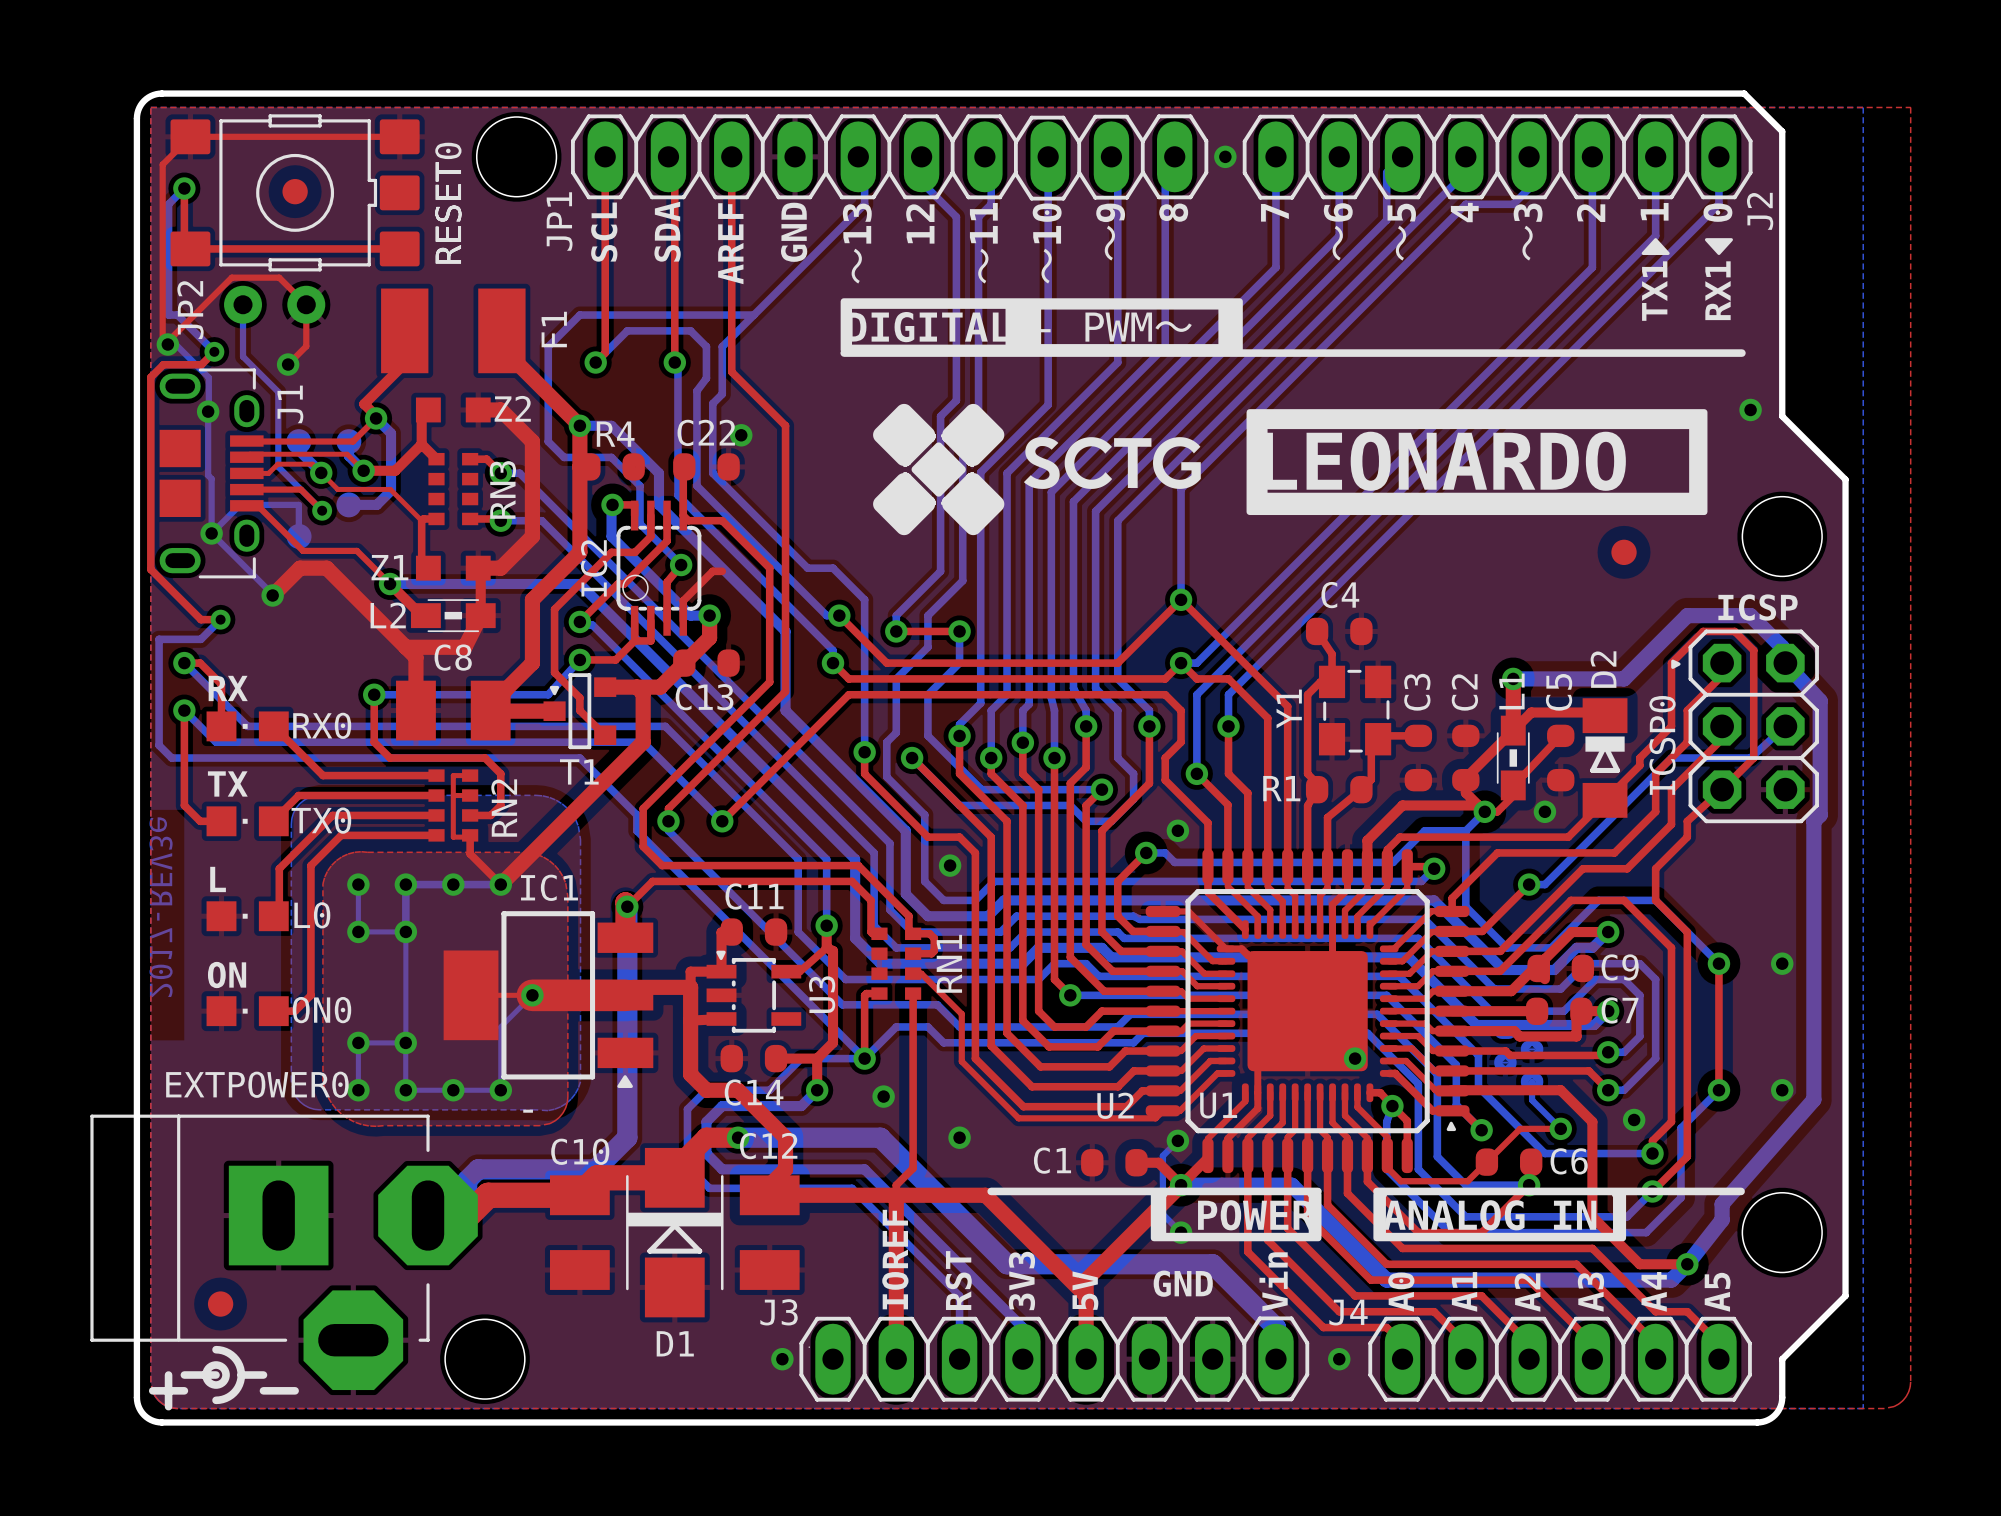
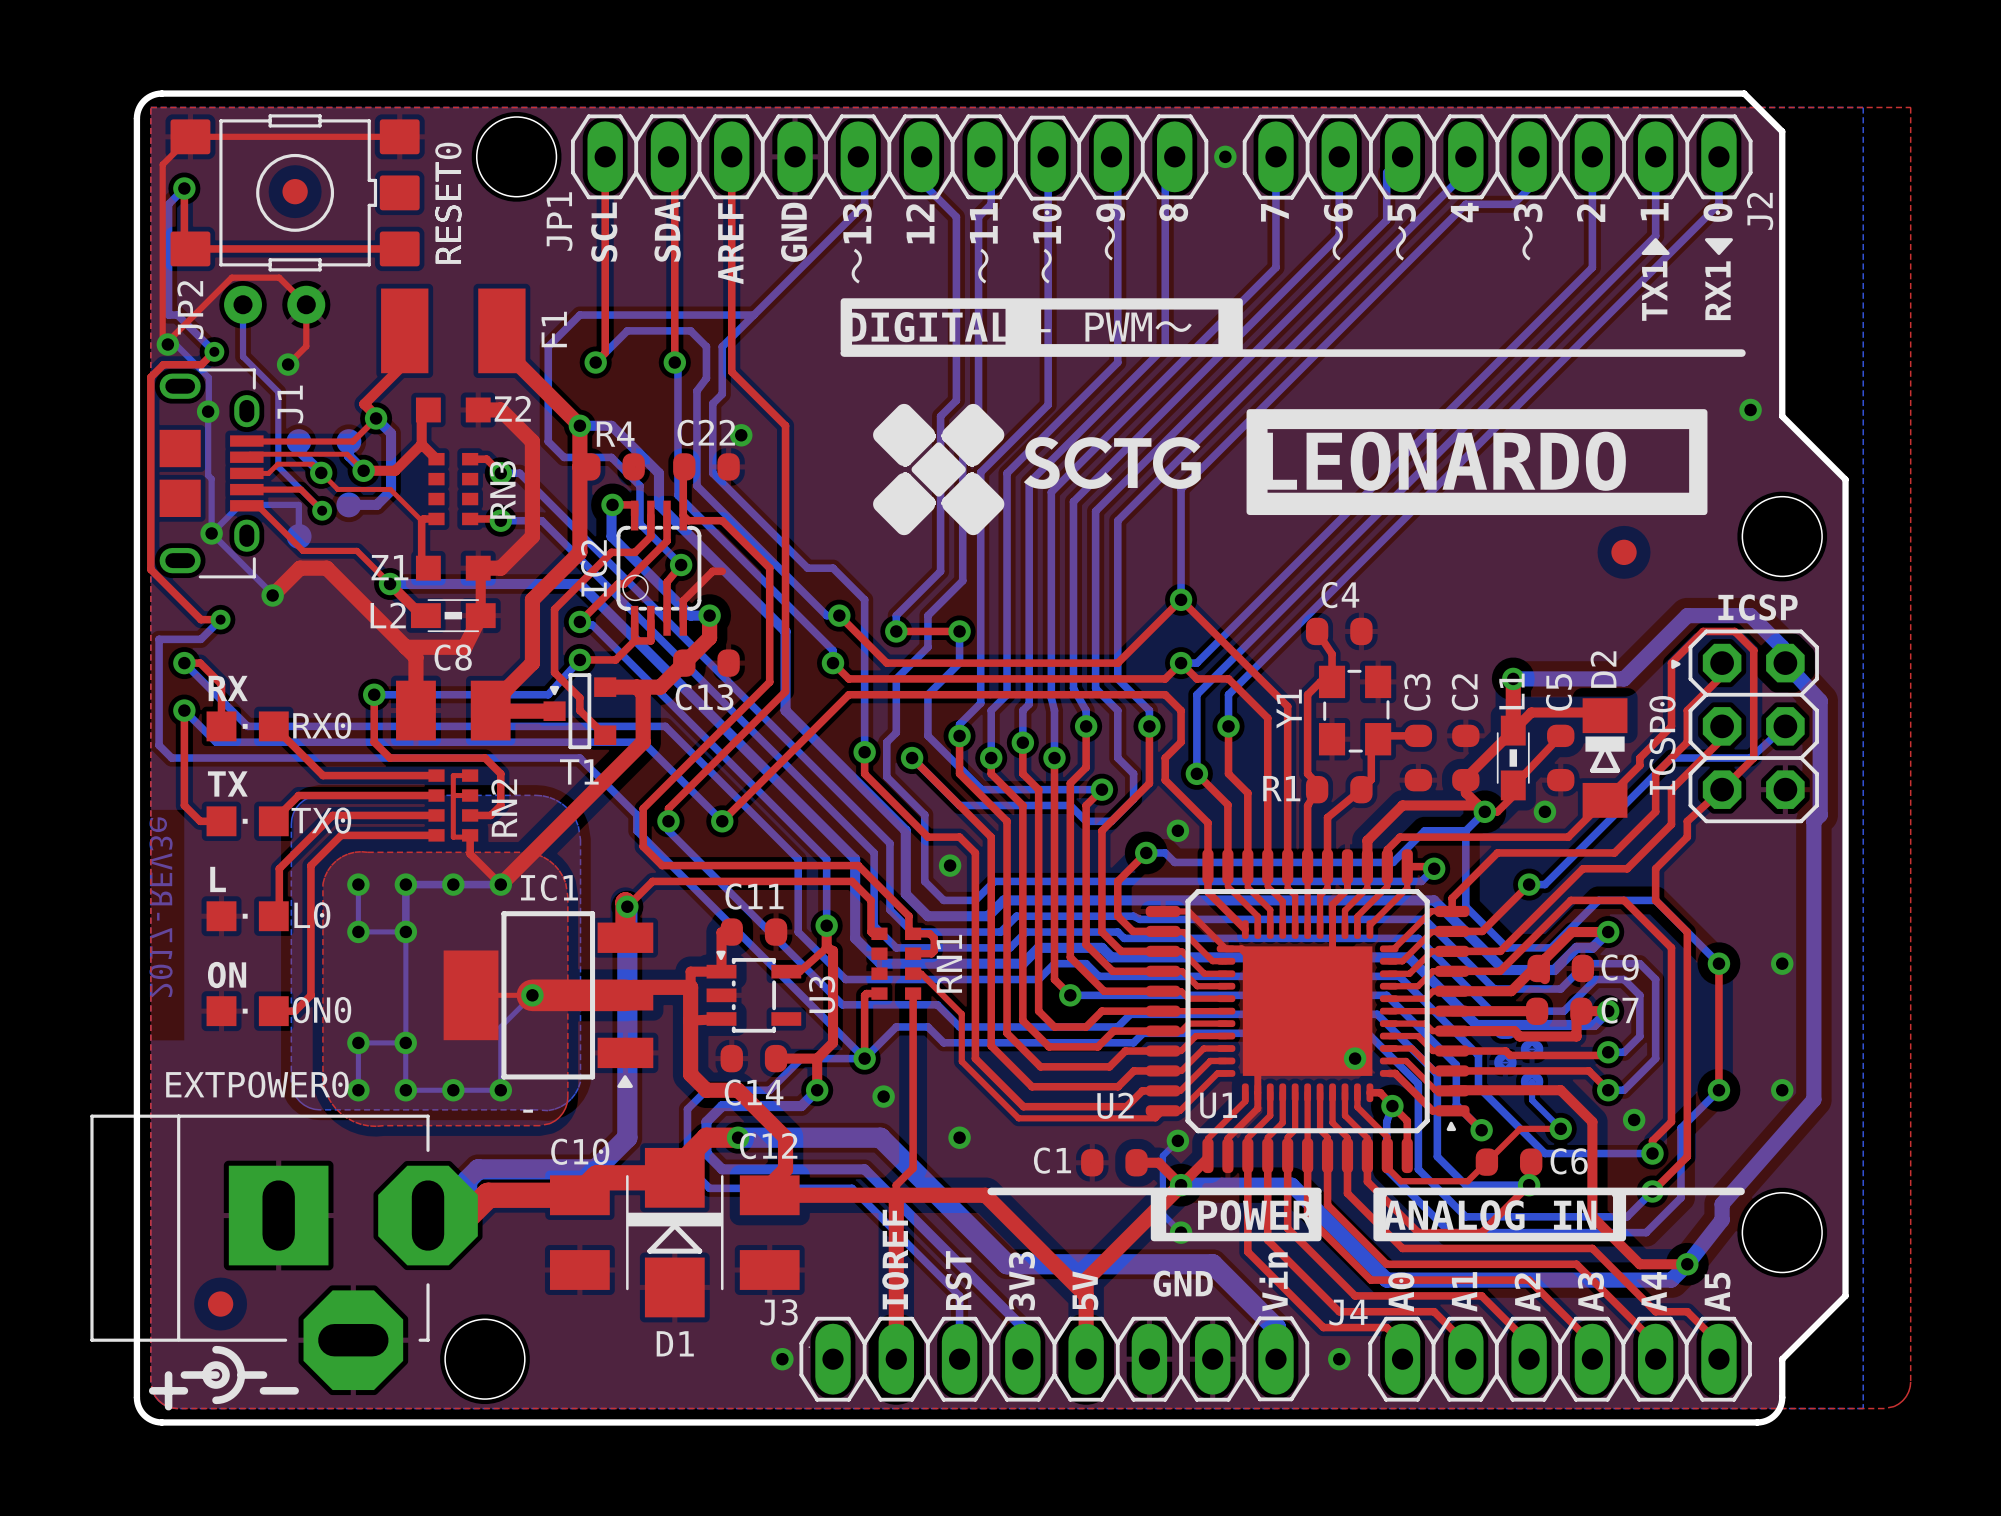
U1 footprint: [1216, 920, 1399, 1103] -> [1216, 920, 1399, 1103]

